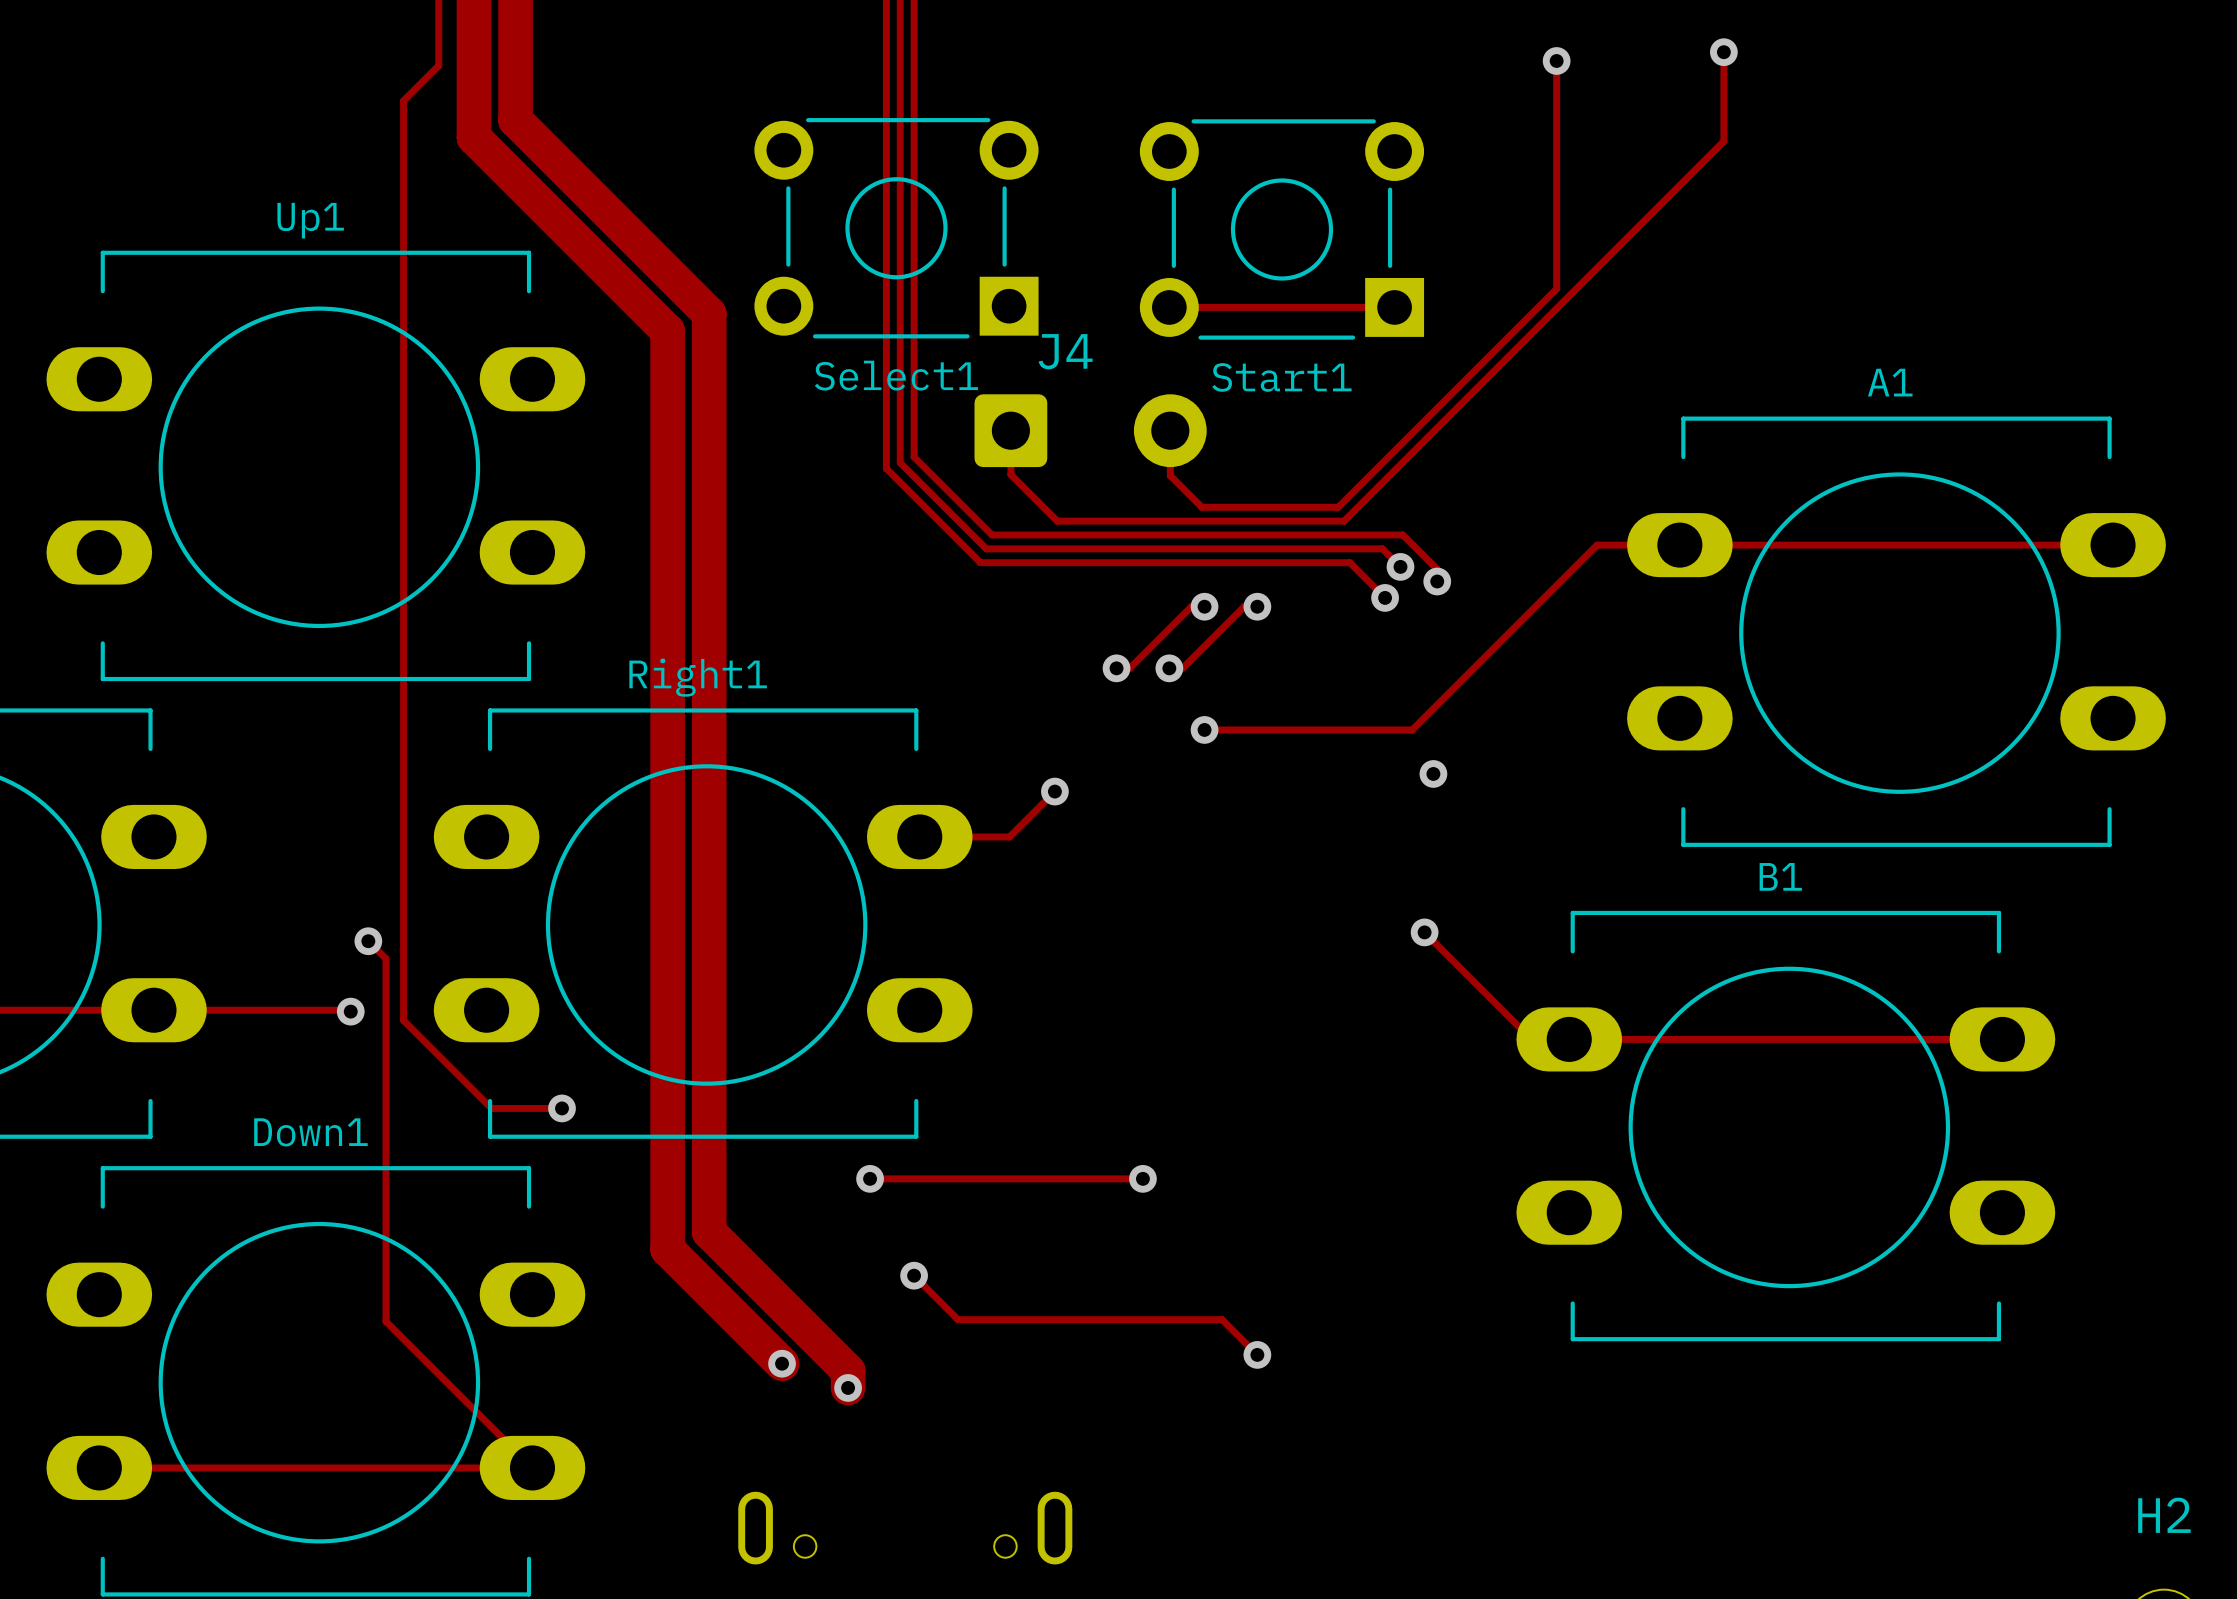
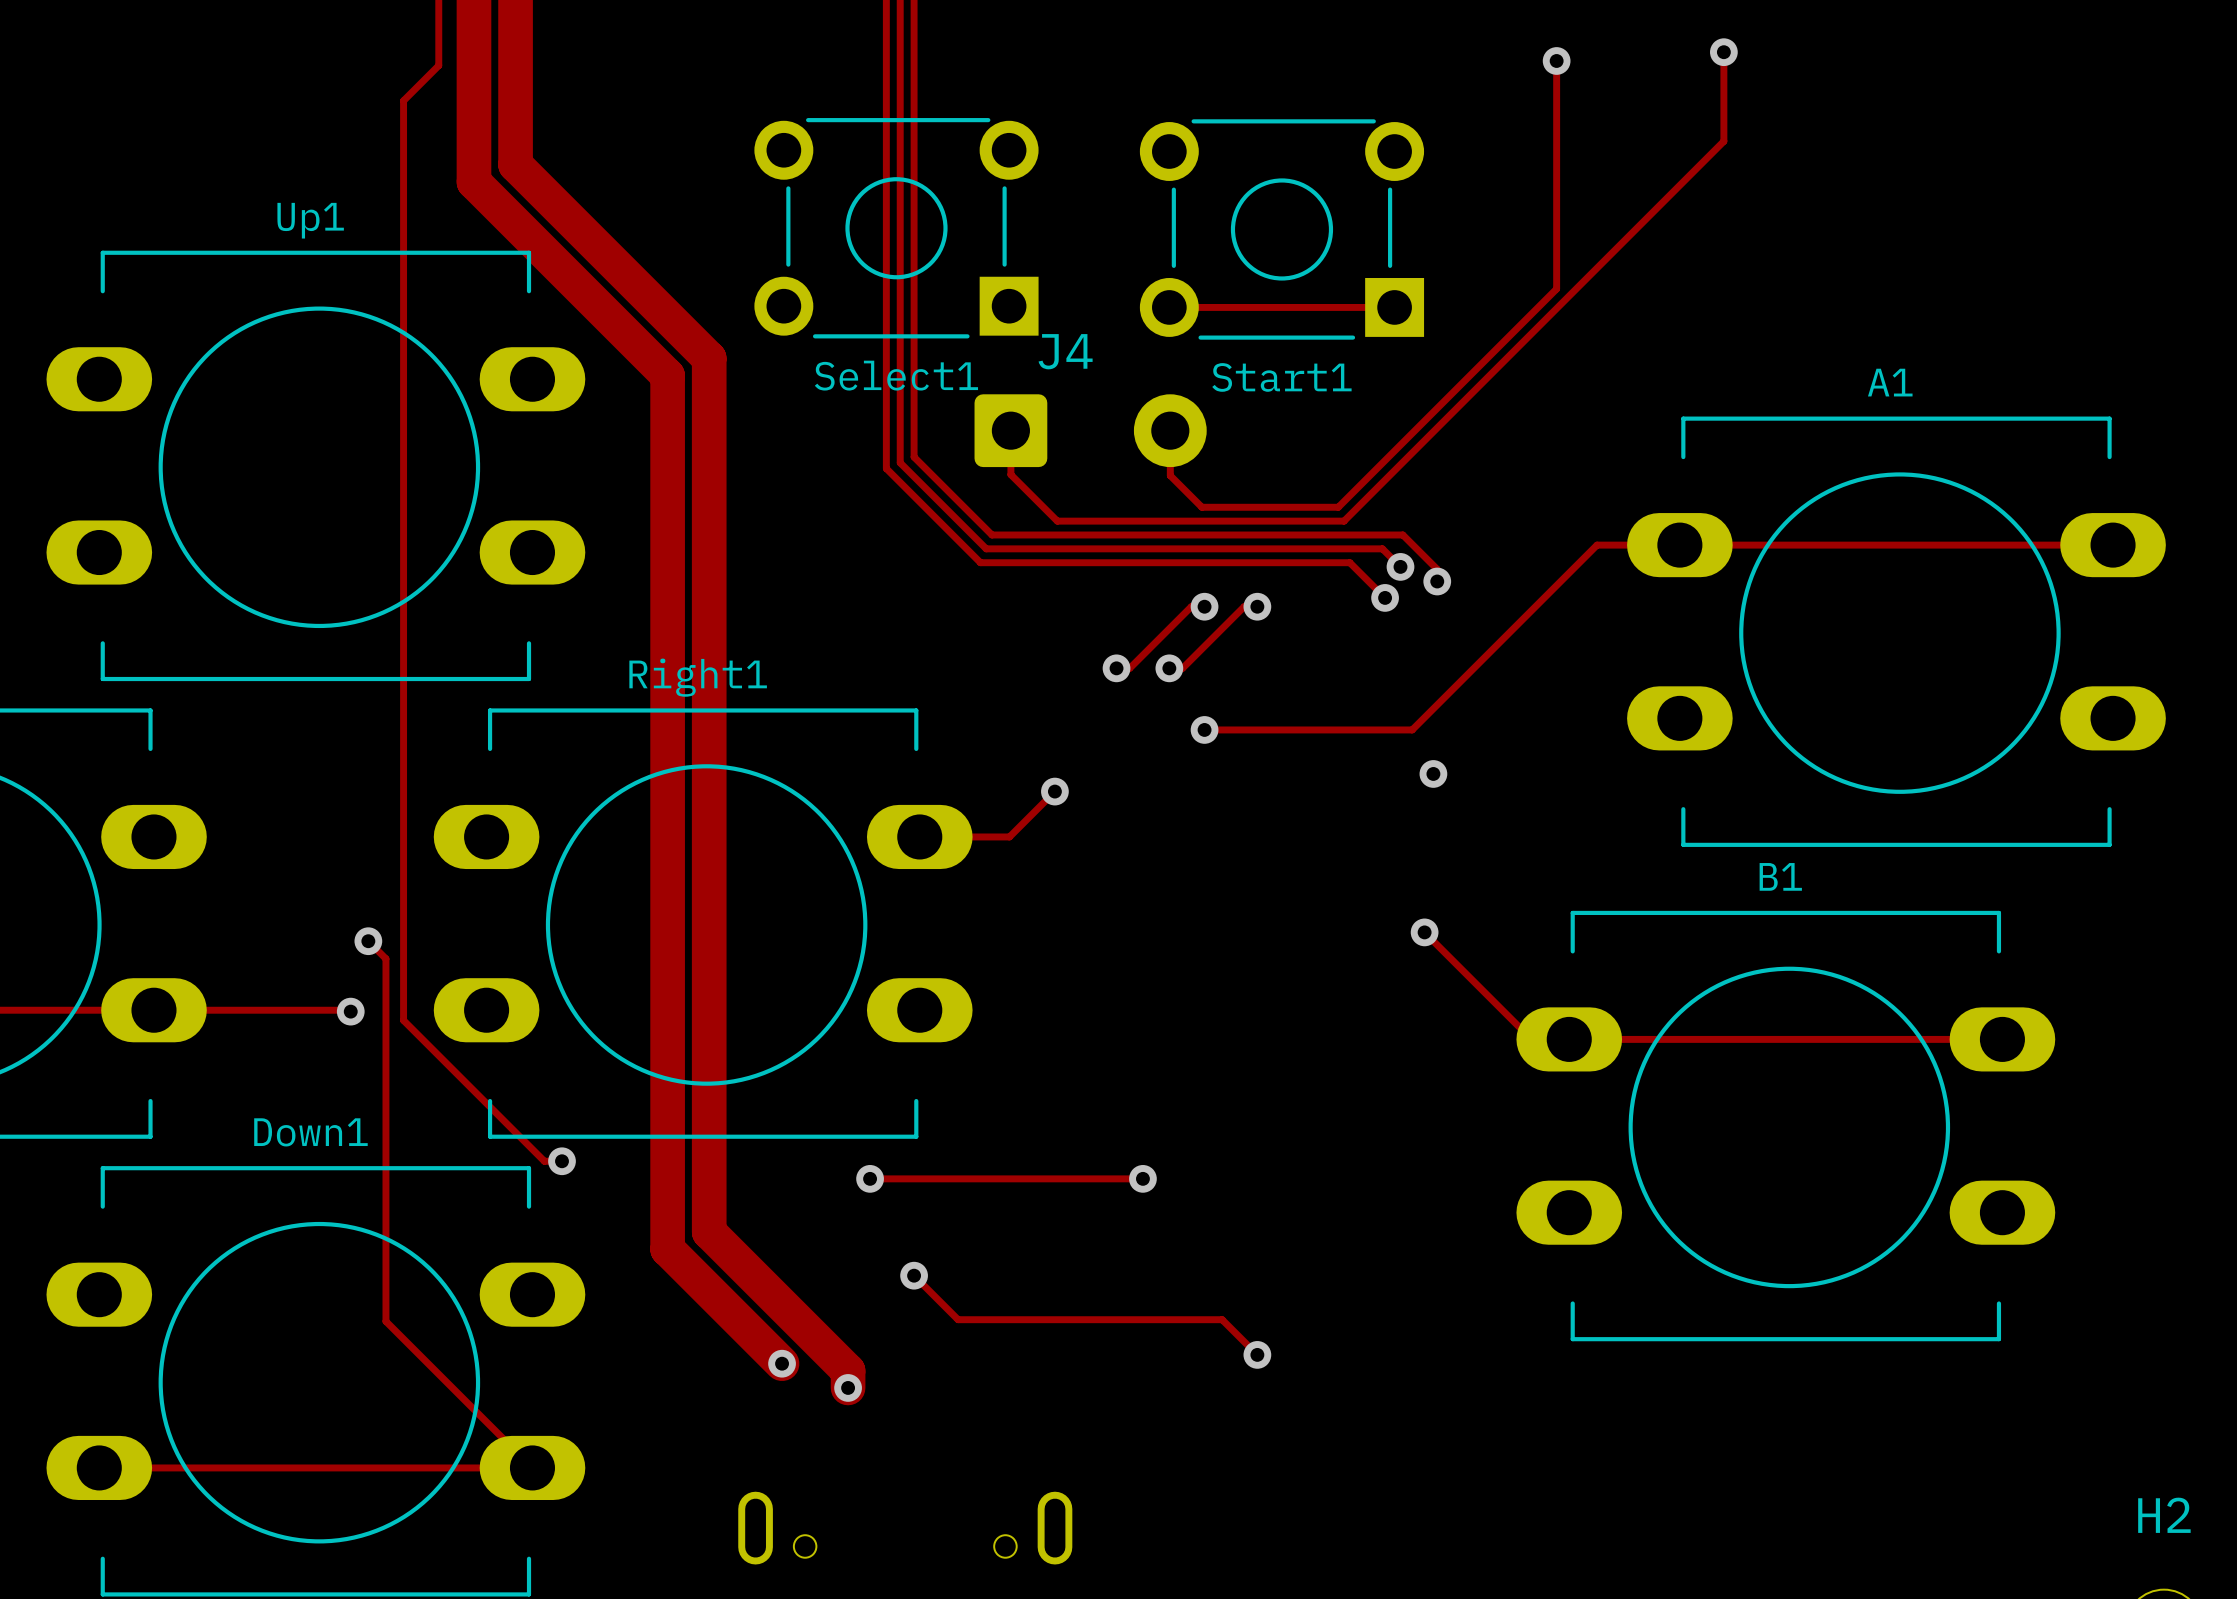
track: (515, 120) (709, 313) (709, 358) -> (515, 120) (515, 164) (709, 358)
track: (473, 137) (667, 331) (667, 375) -> (473, 137) (473, 182) (667, 375)
track: (491, 1108) (562, 1108) -> (491, 1108) (544, 1161) (562, 1161)
via position: (562, 1108) -> (562, 1161)

